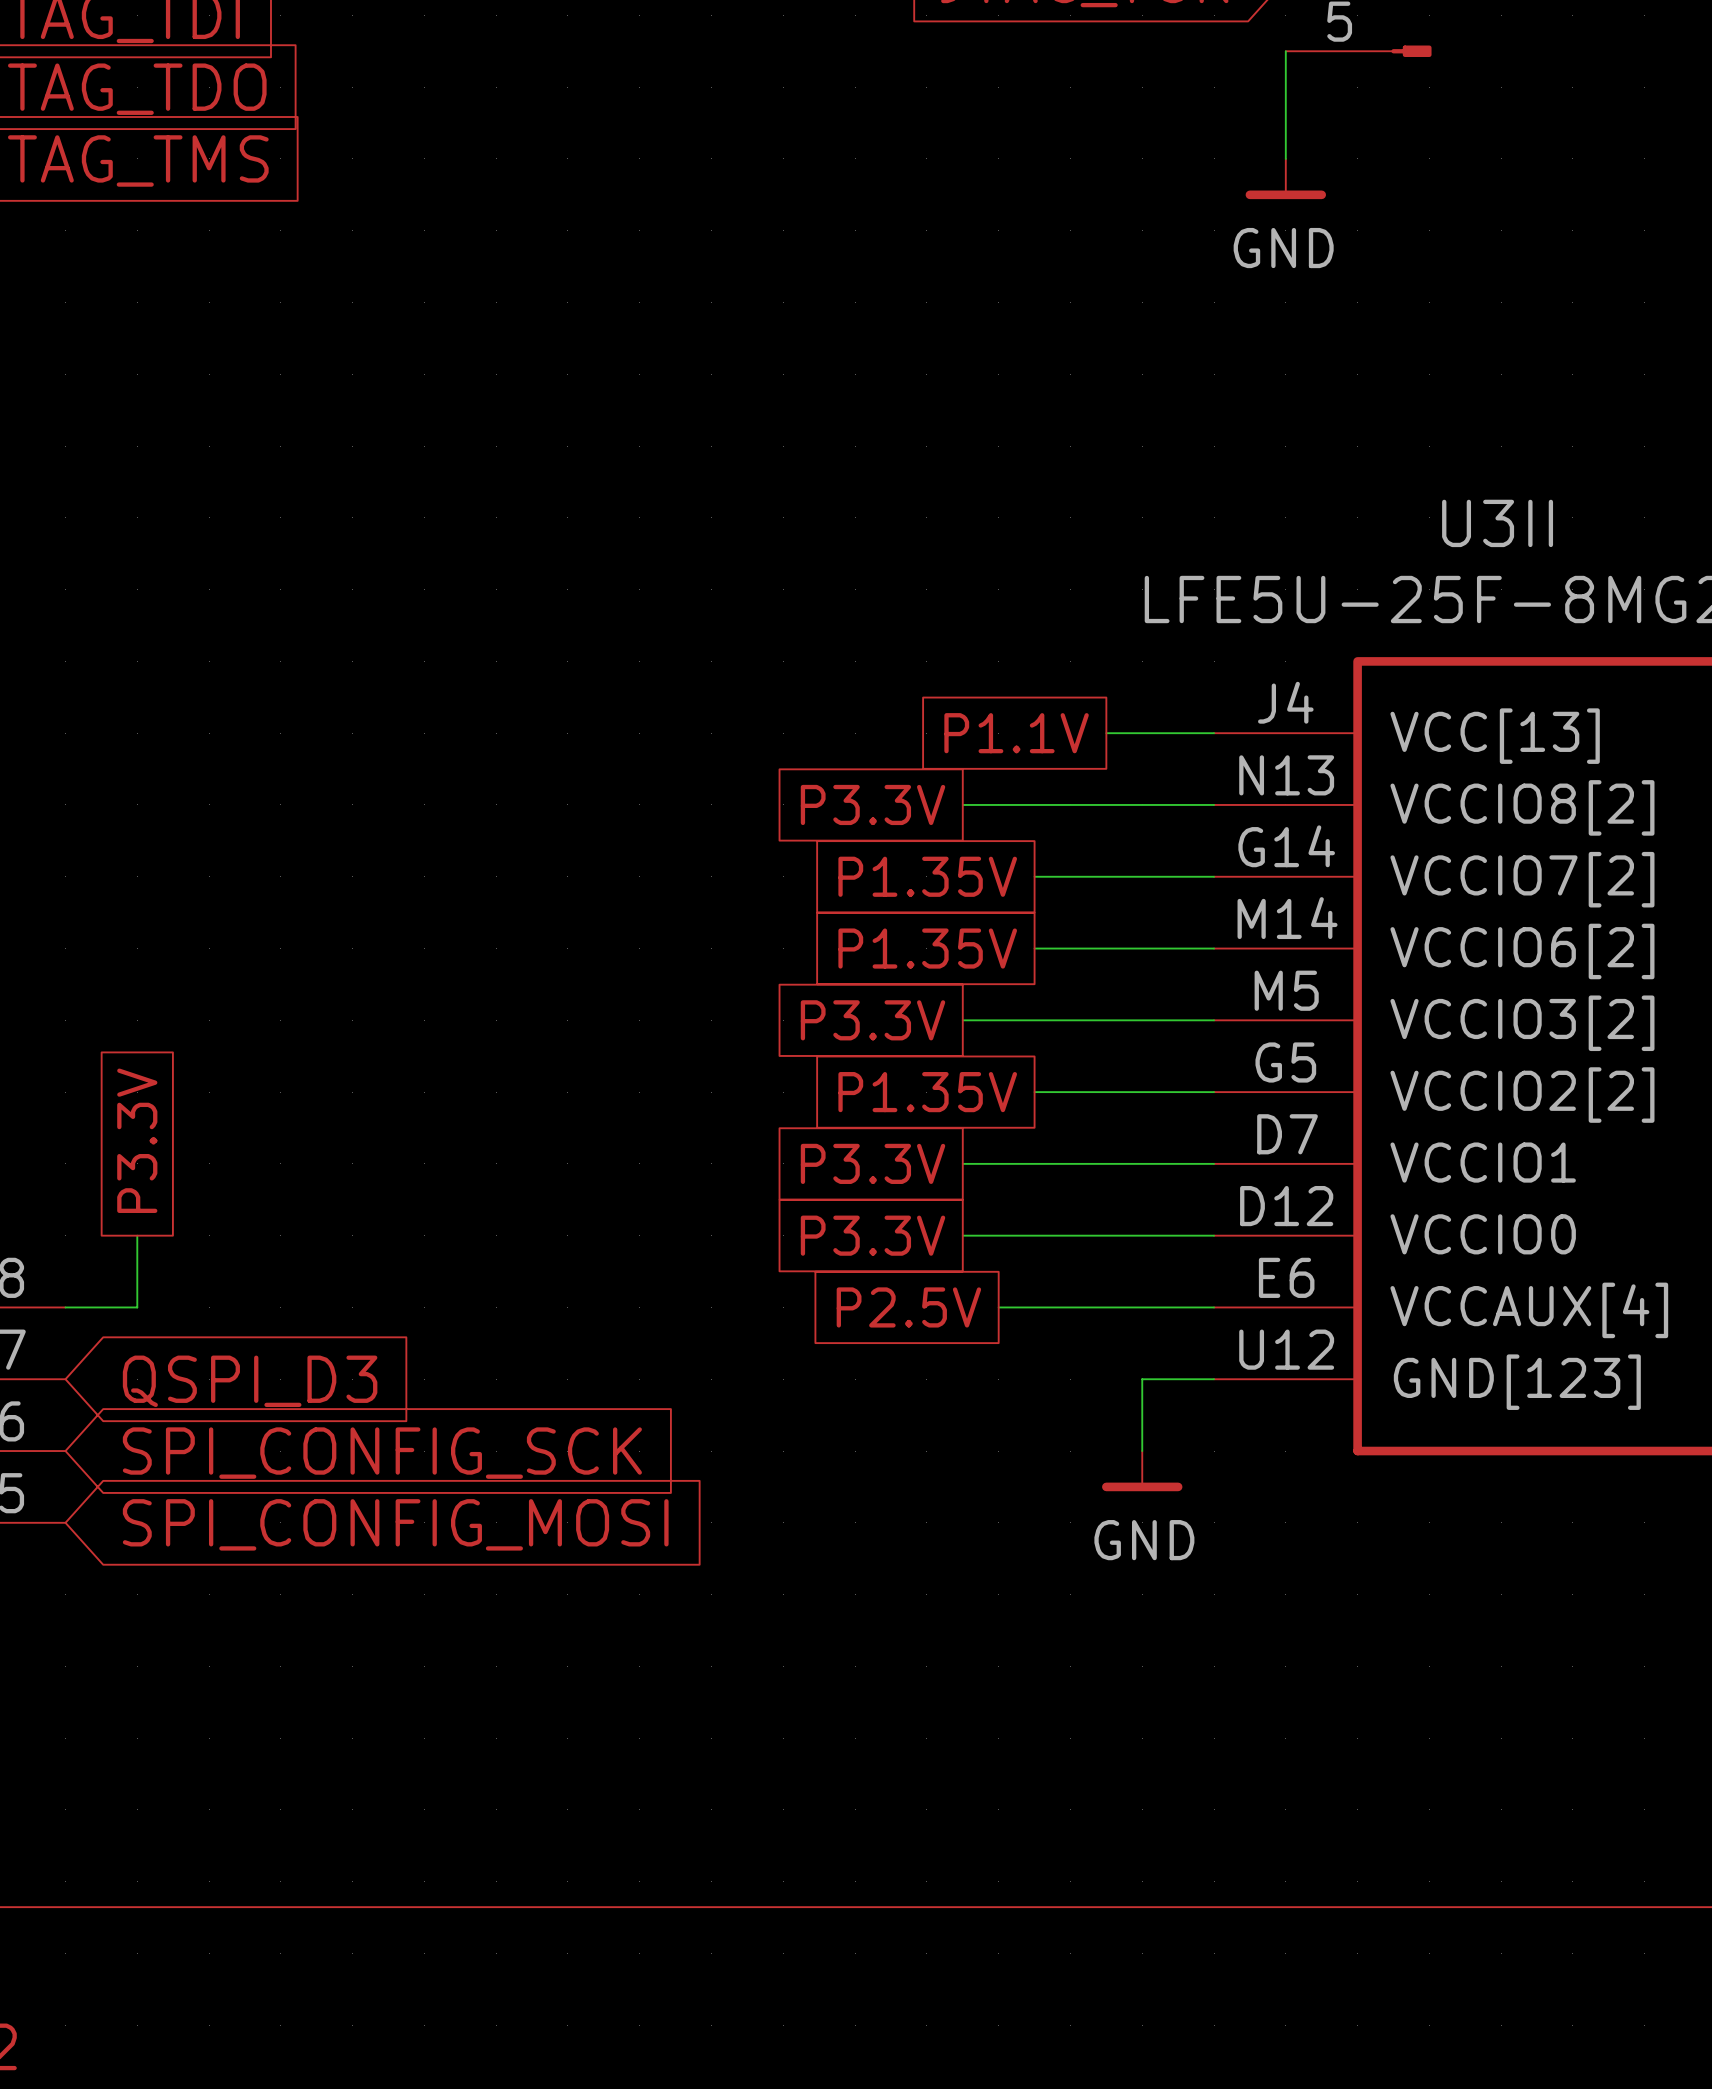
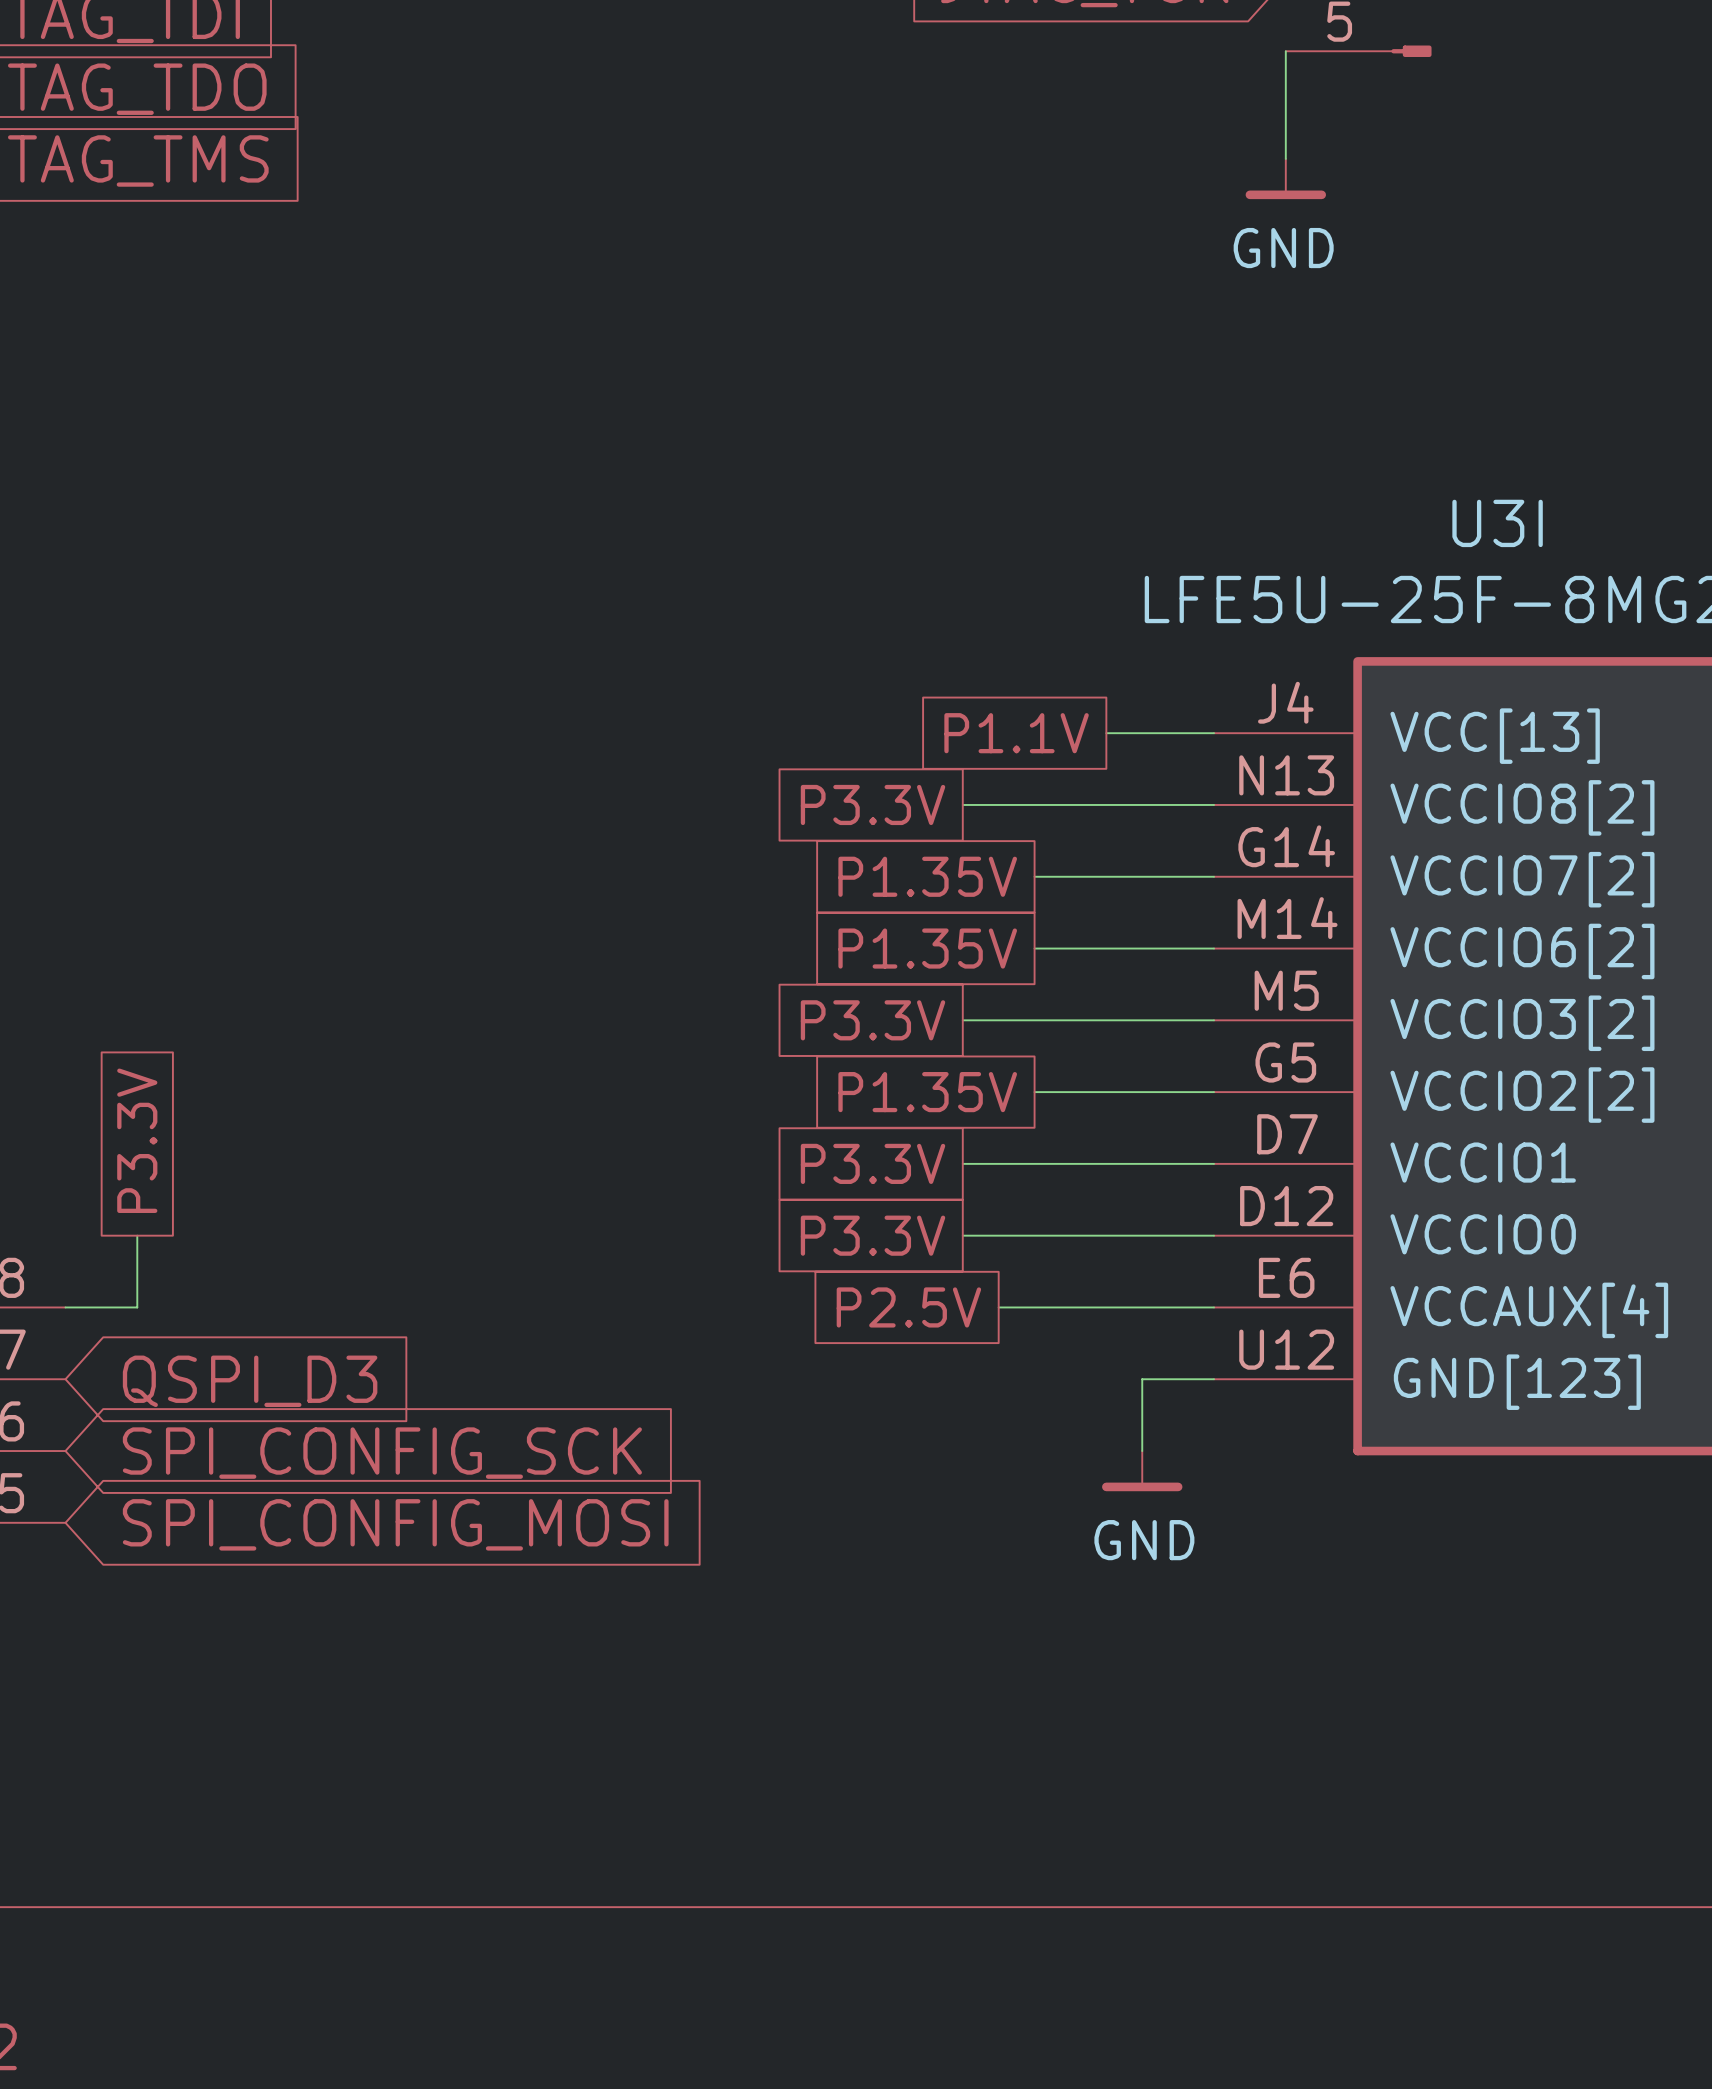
U3II name: U3II (1497, 523) -> U3I (1497, 523)

